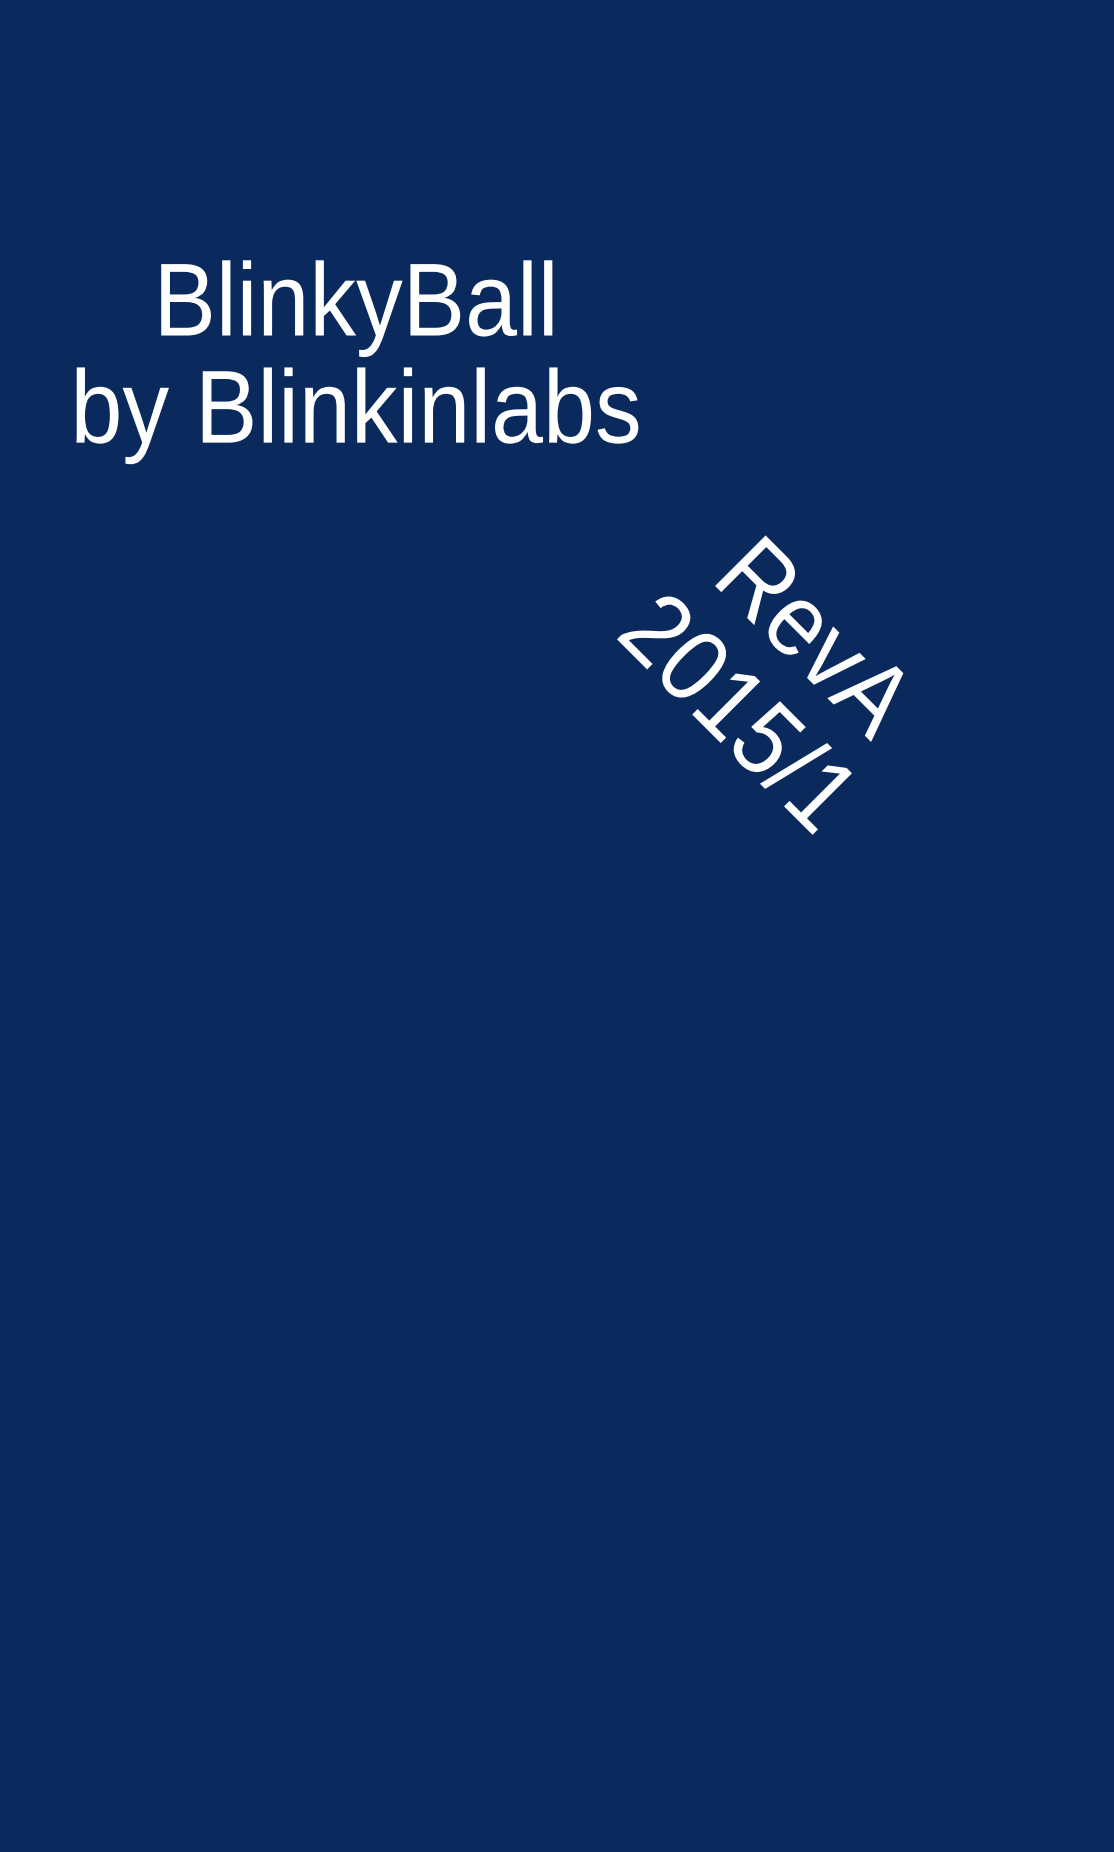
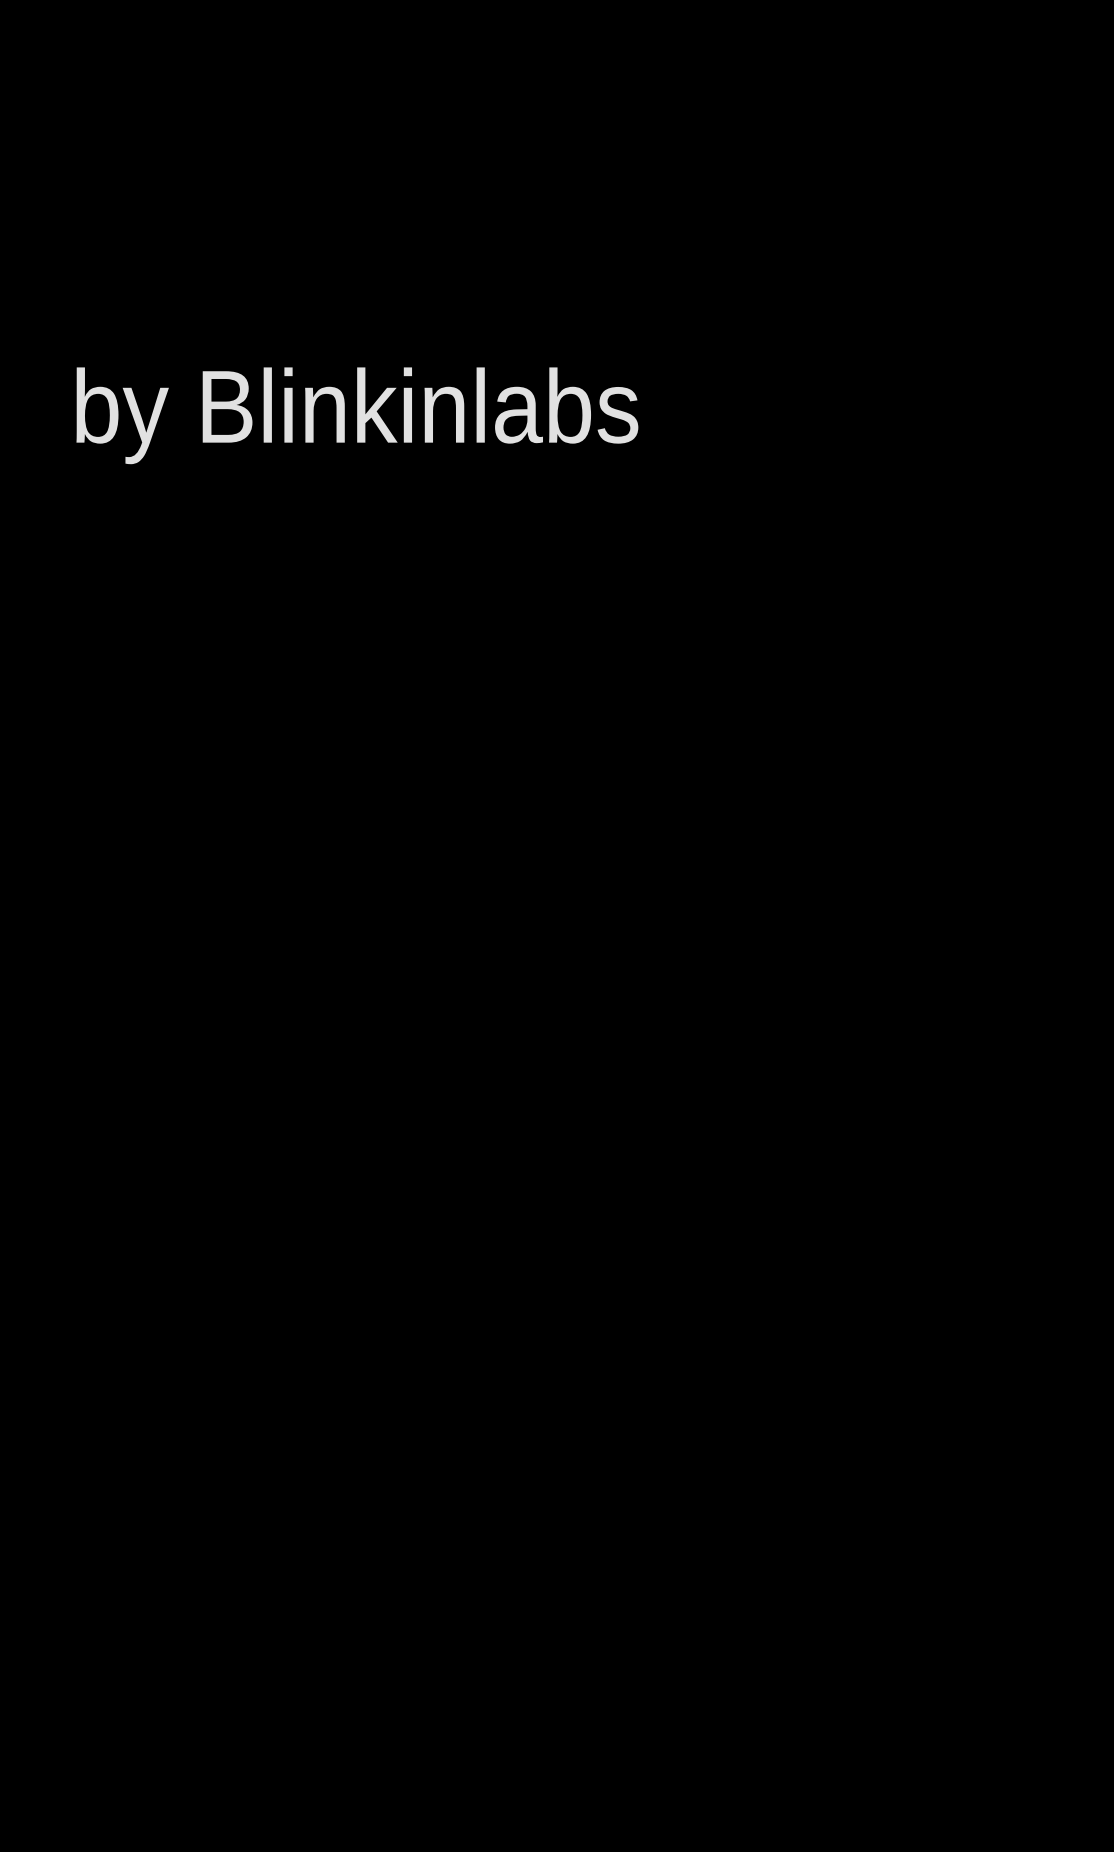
text: BlinkyBall (356, 308) -> none
text: RevA (809, 638) -> none
text: 2015/1 (734, 715) -> none

